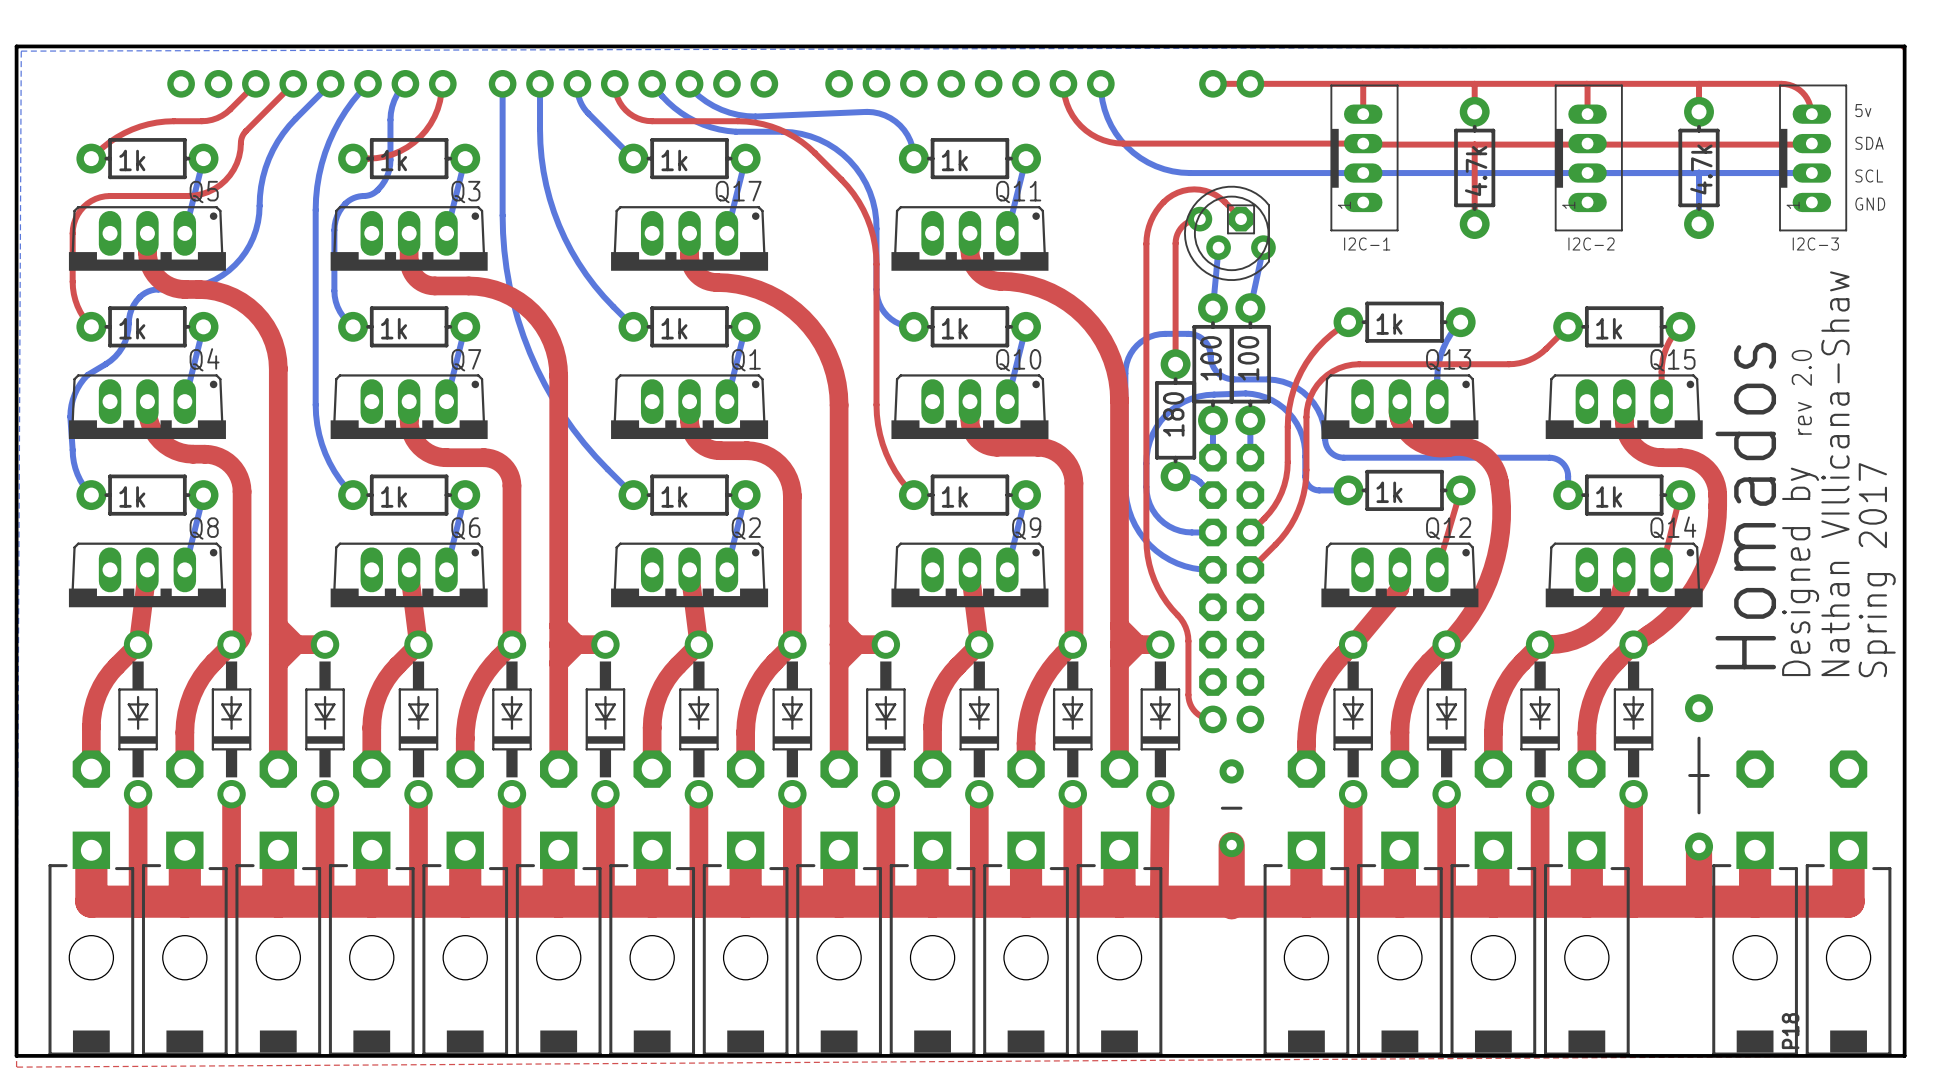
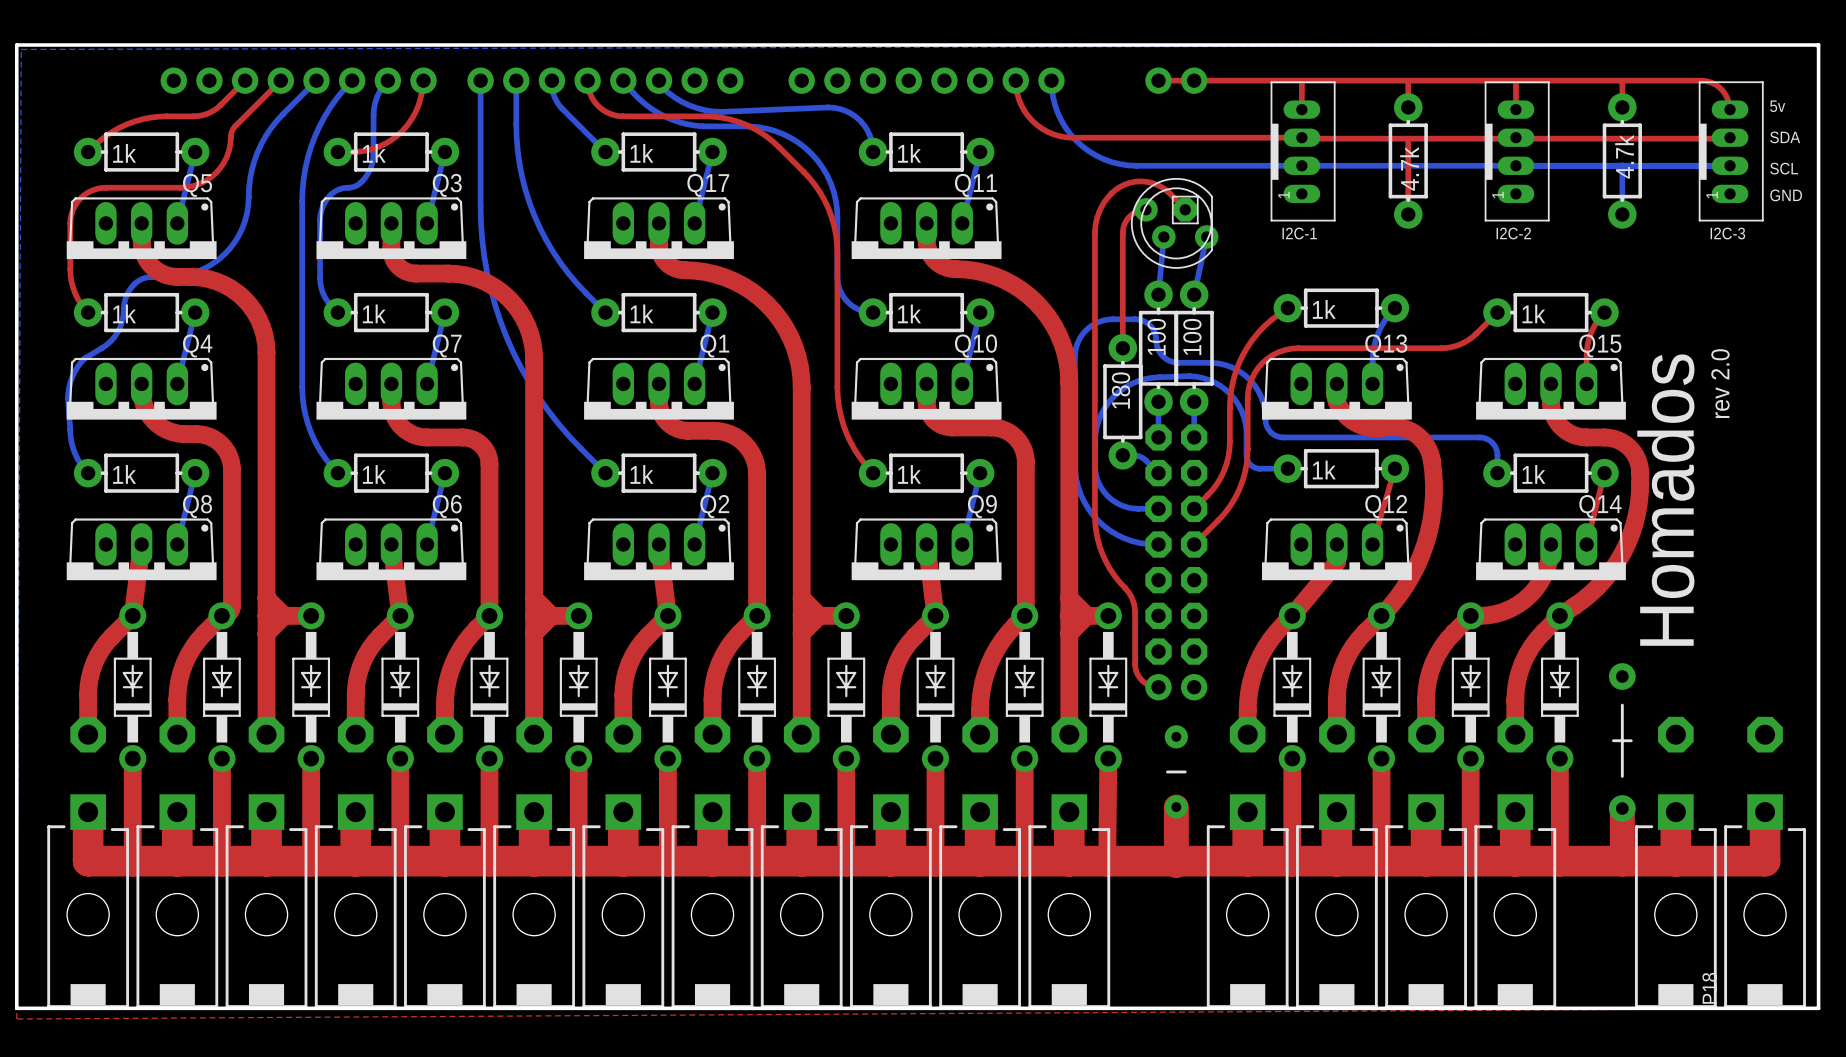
text: Nathan VIllicana-Shaw (1835, 473) -> none
text: Spring 2017 (1877, 570) -> none
text: Designed by (1800, 571) -> none

